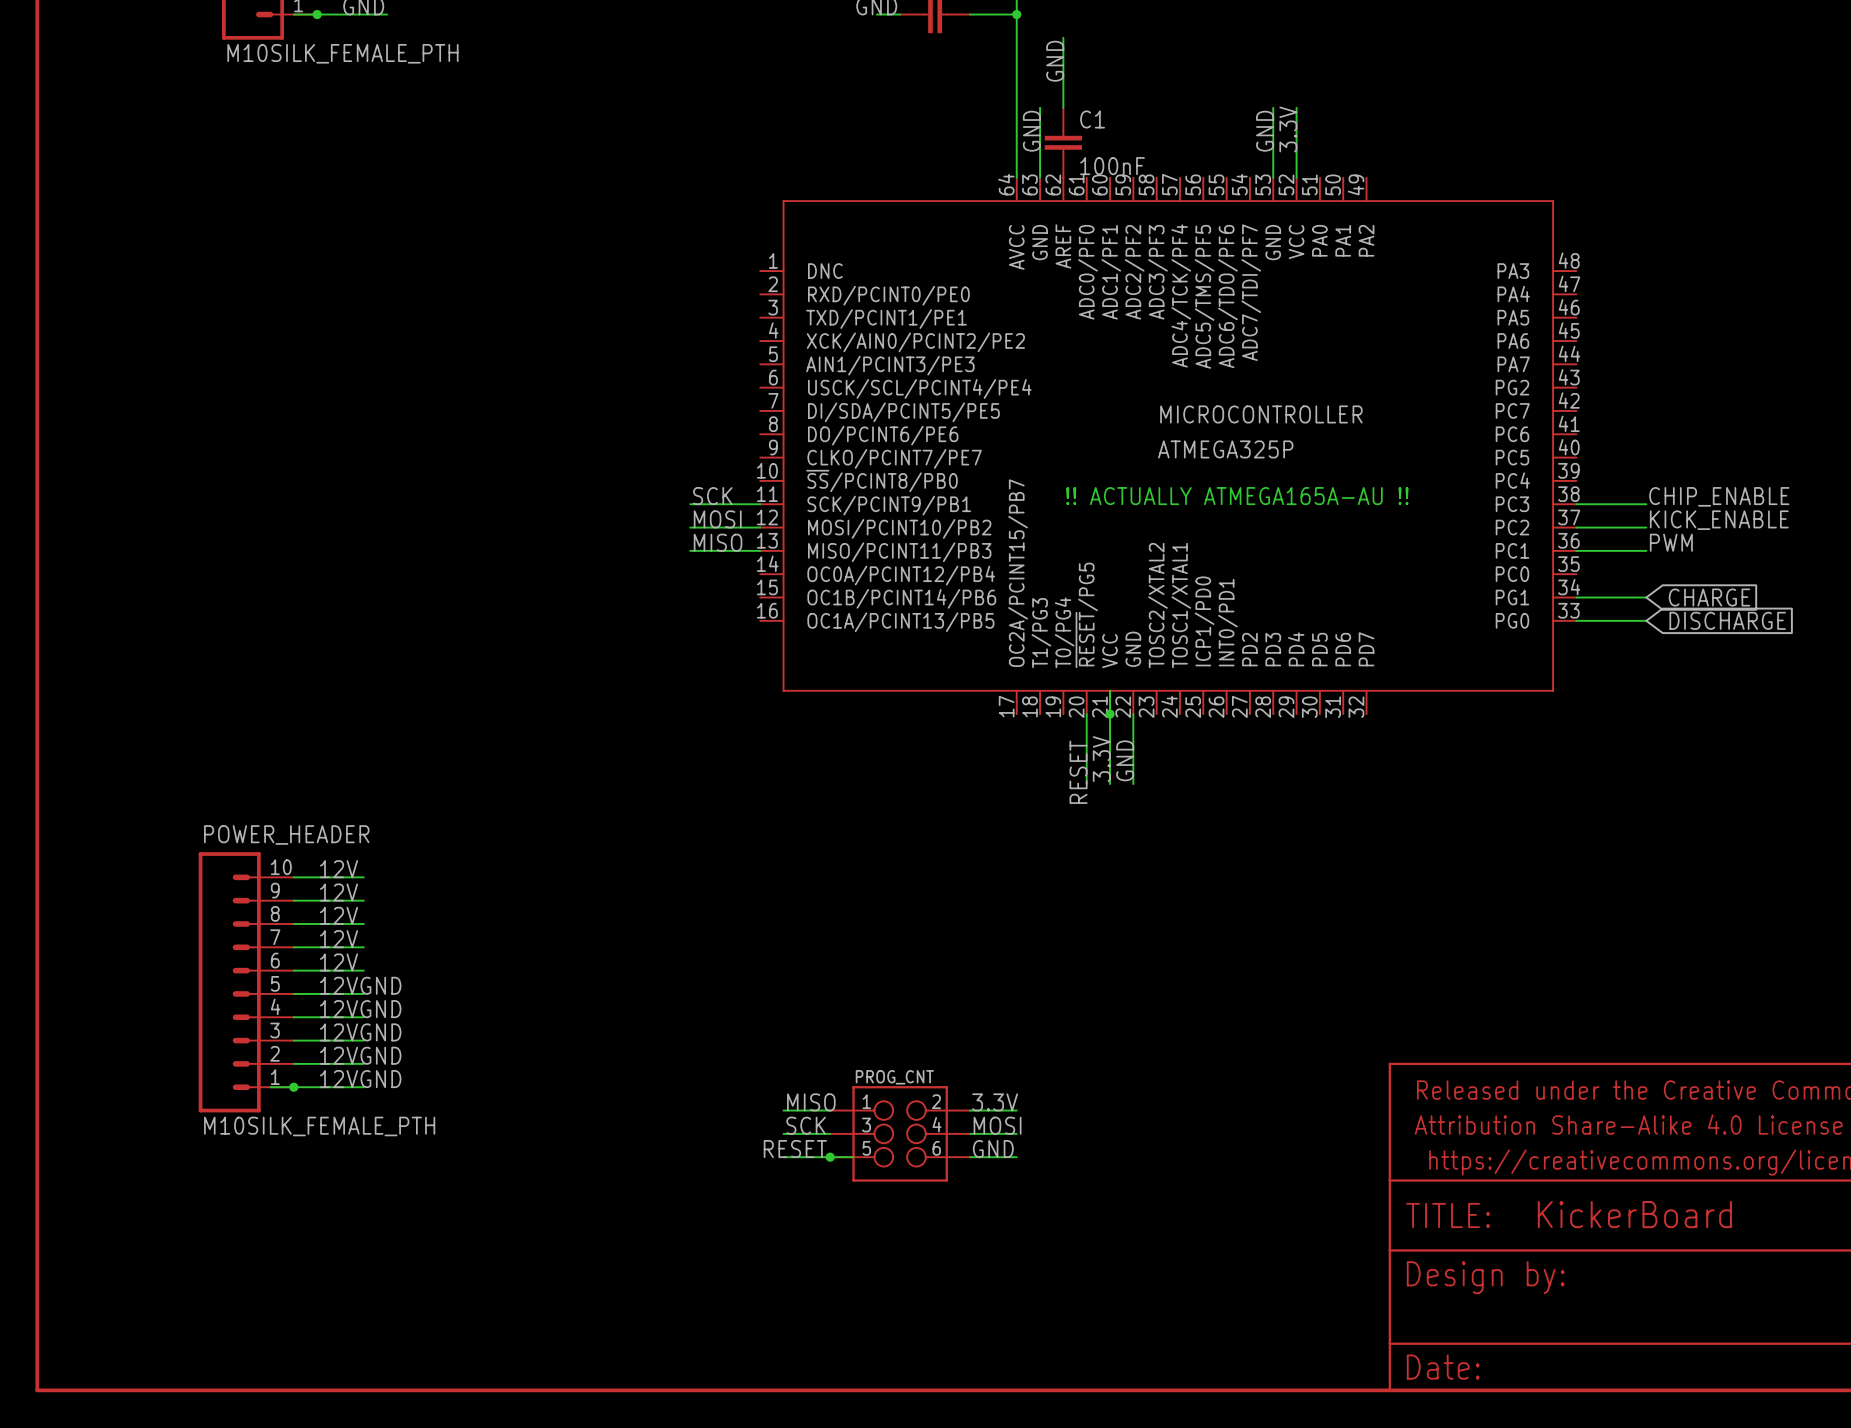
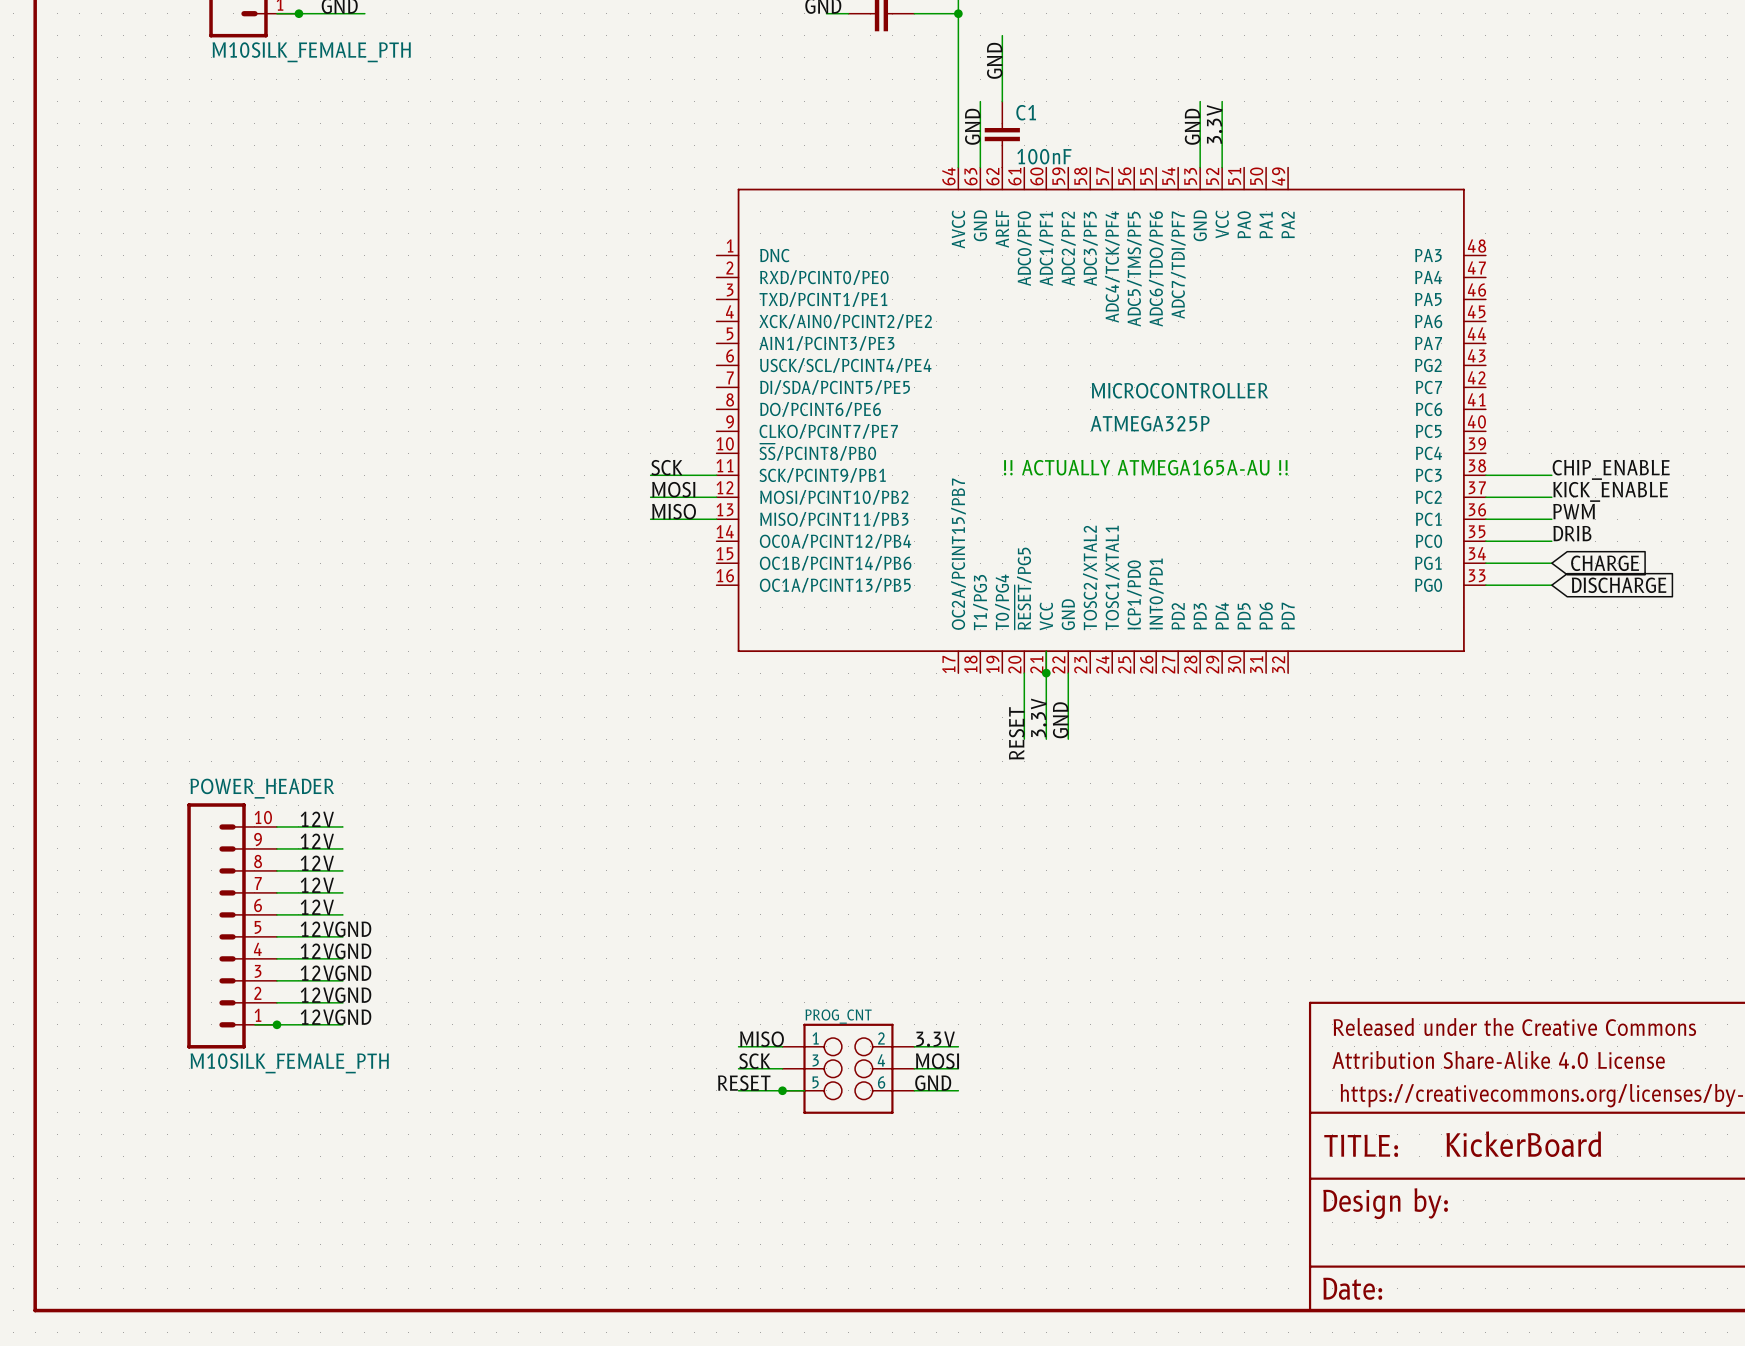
label: none -> DRIB (1572, 533)
wire: none -> (1485, 541) (1551, 541)

